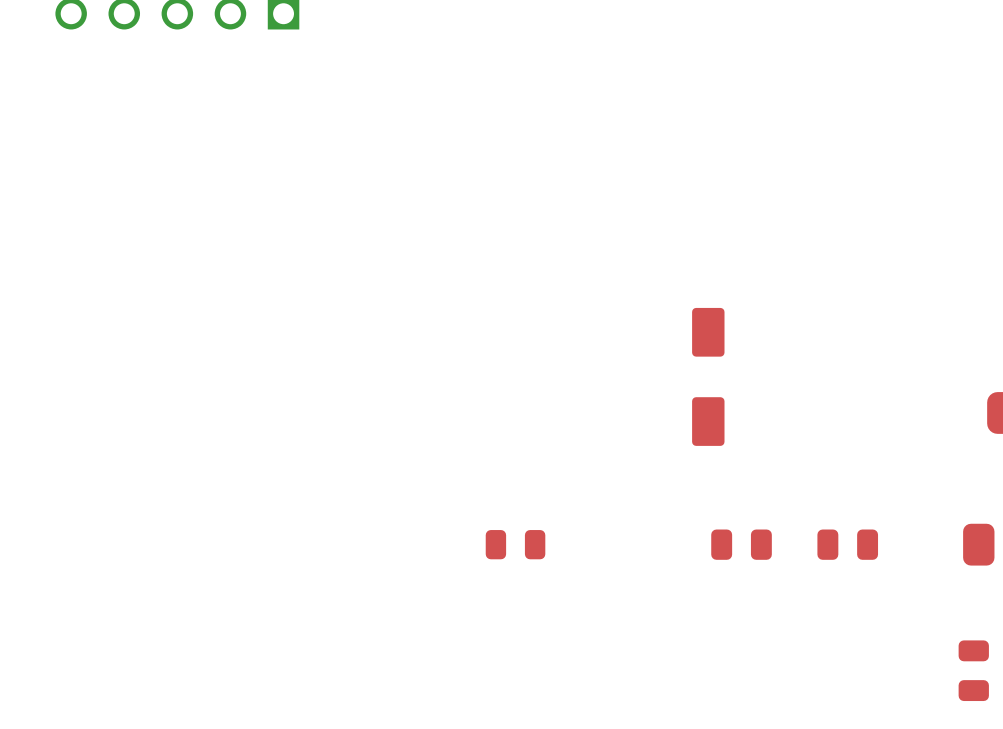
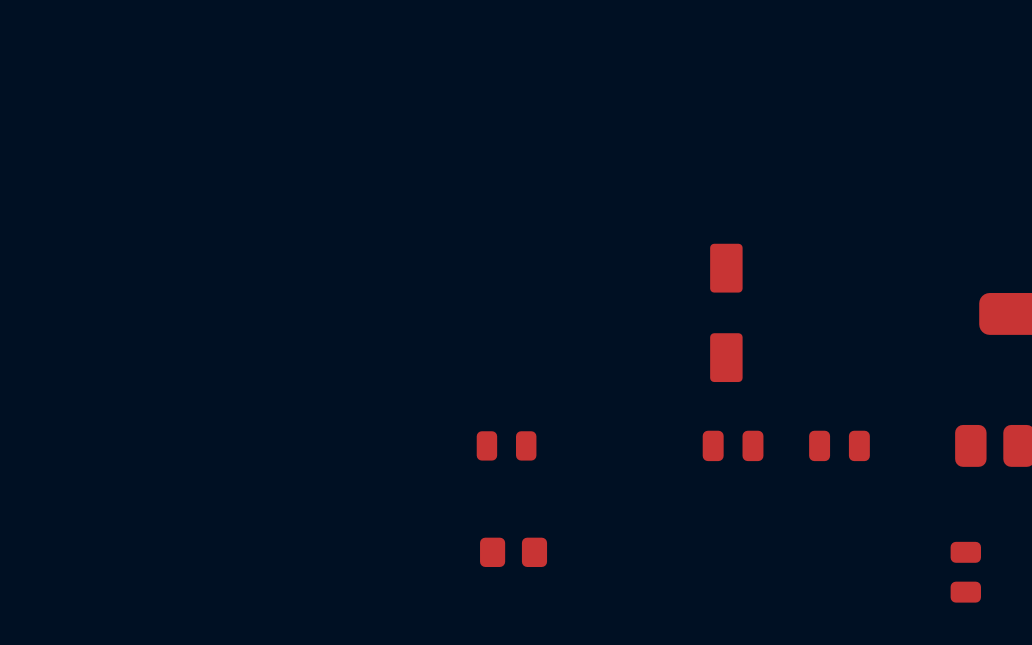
part position: (708, 376) -> (726, 312)
part: none -> (513, 552)

